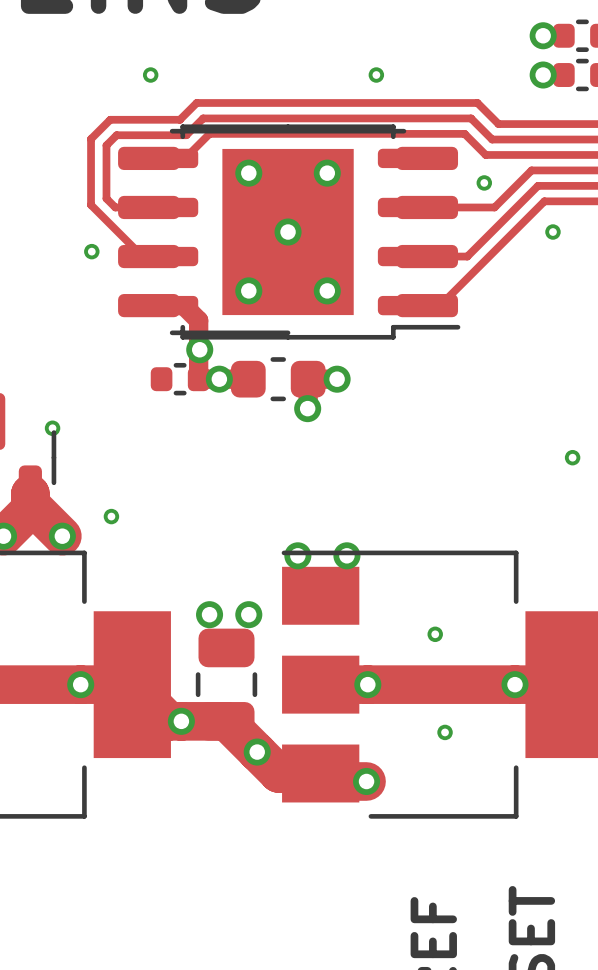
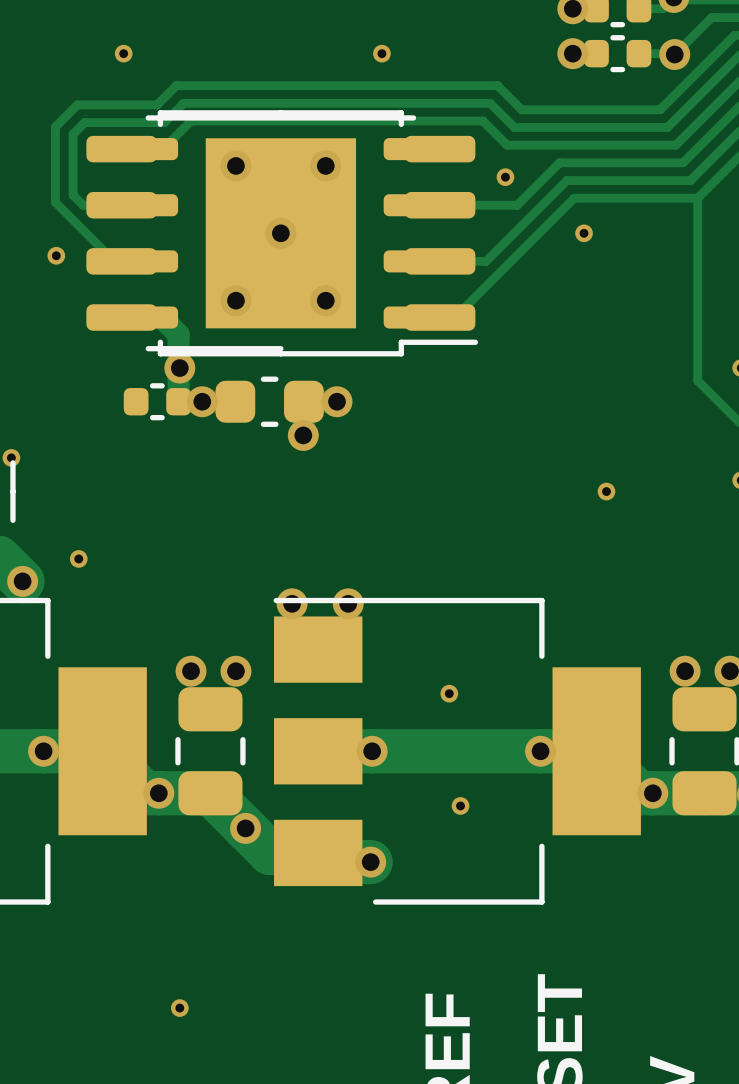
via: none -> (179, 1008)

